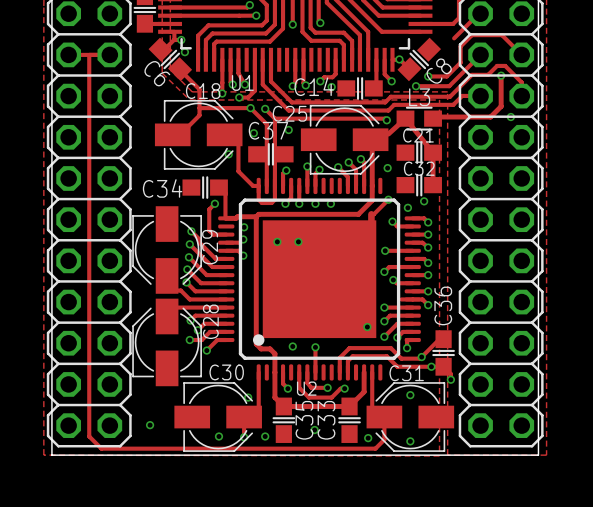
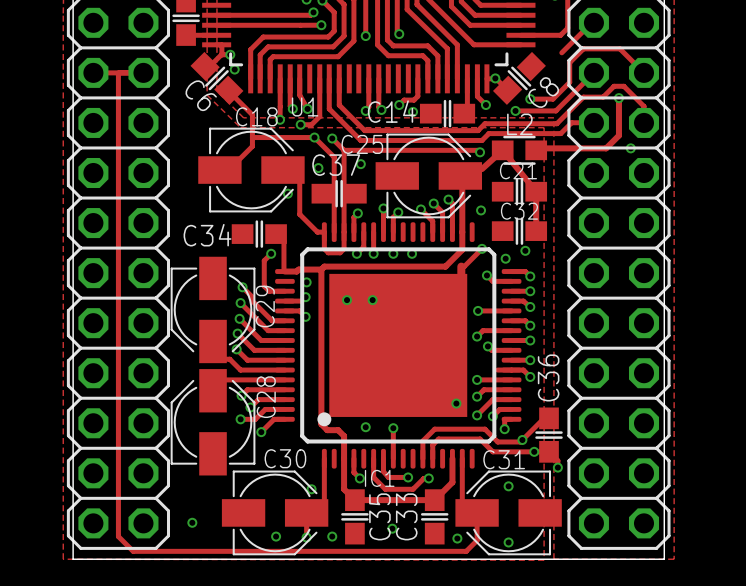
L3 name: L3 (419, 97) -> L2 (519, 124)
U2 name: U2 (306, 388) -> IC1 (379, 478)

